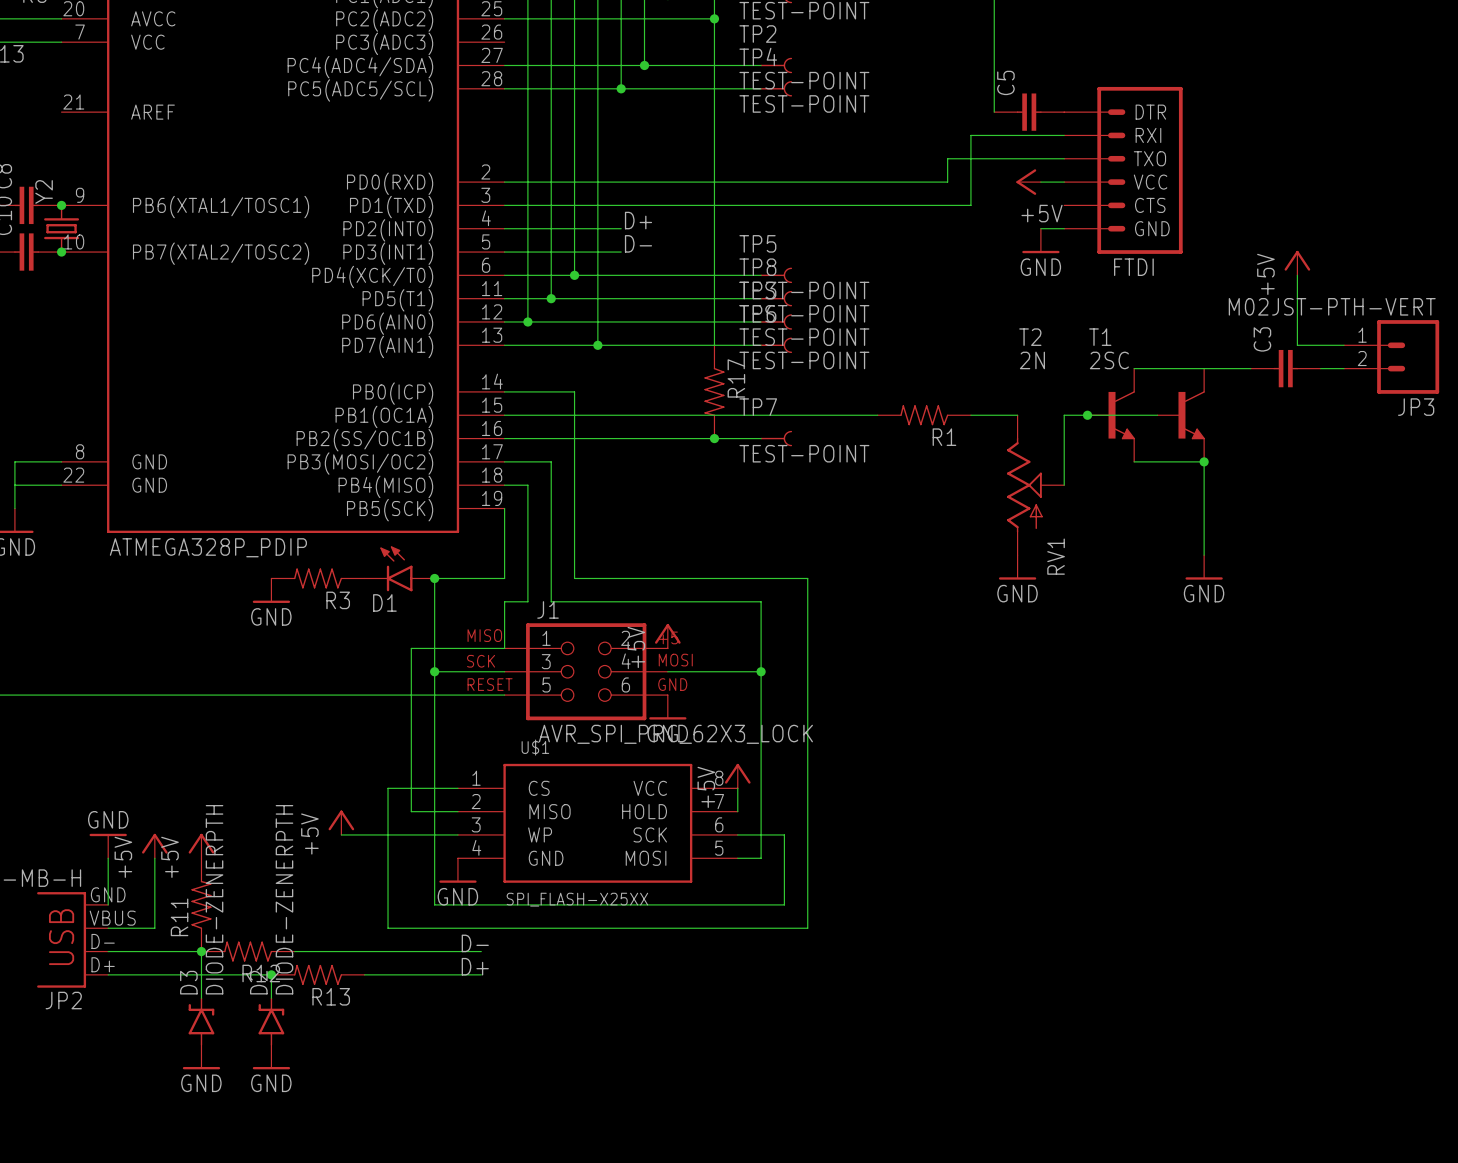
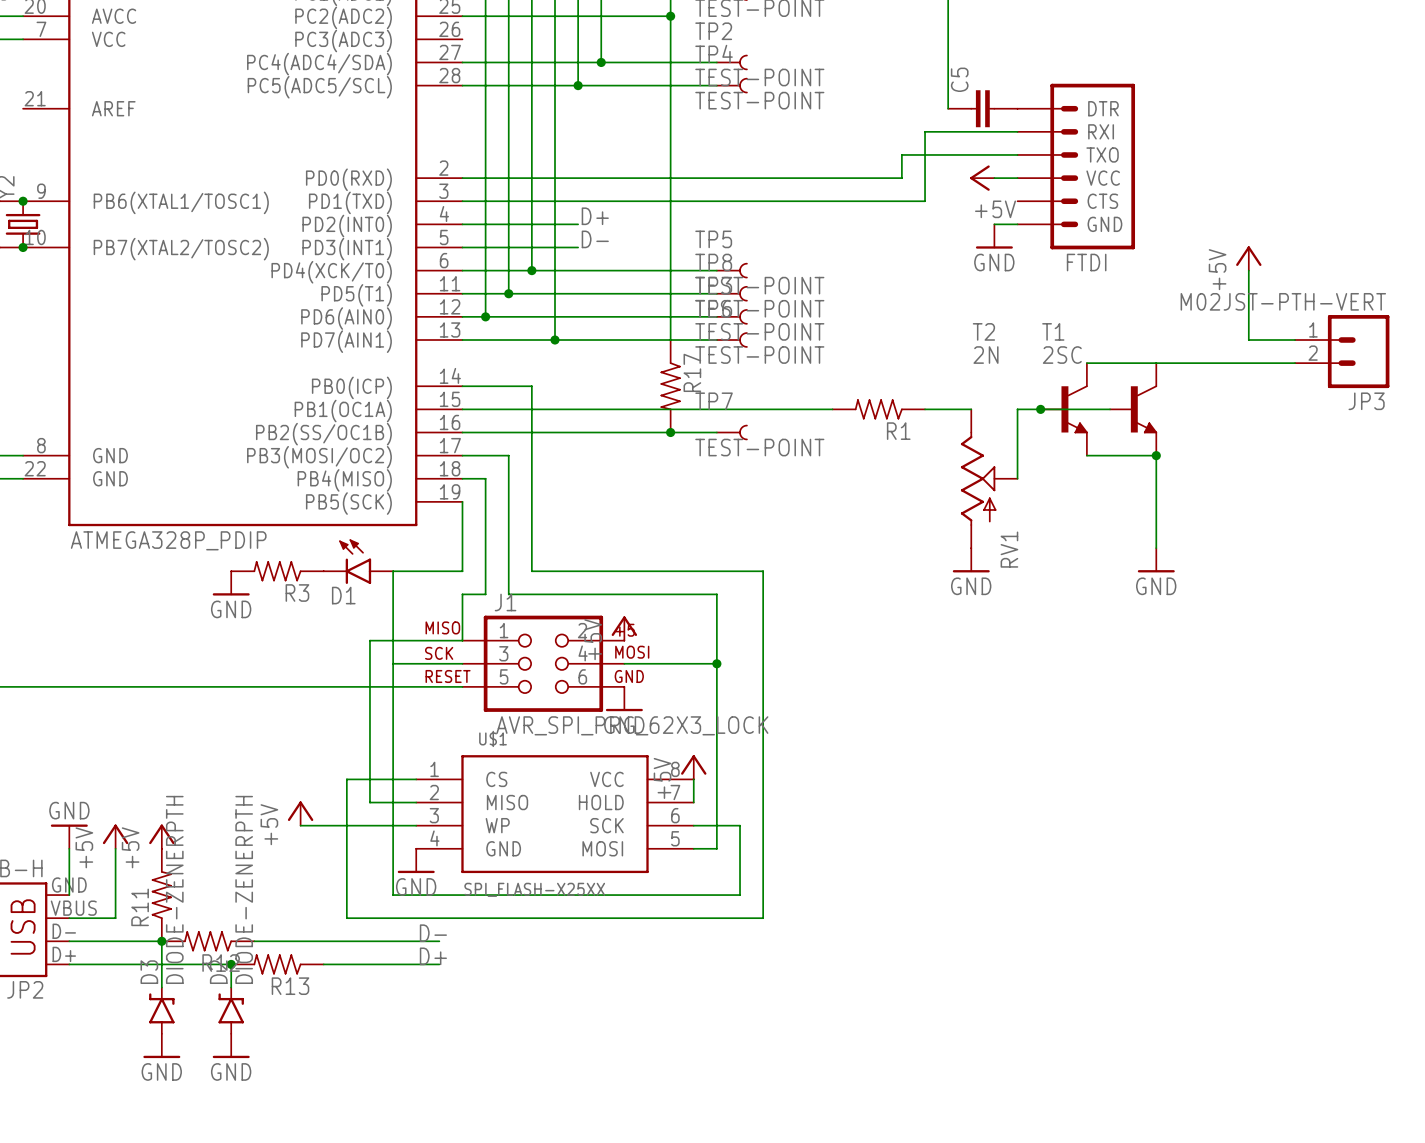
C3: (1285, 368) -> none
junction: (434, 578) -> none
junction: (434, 671) -> none

